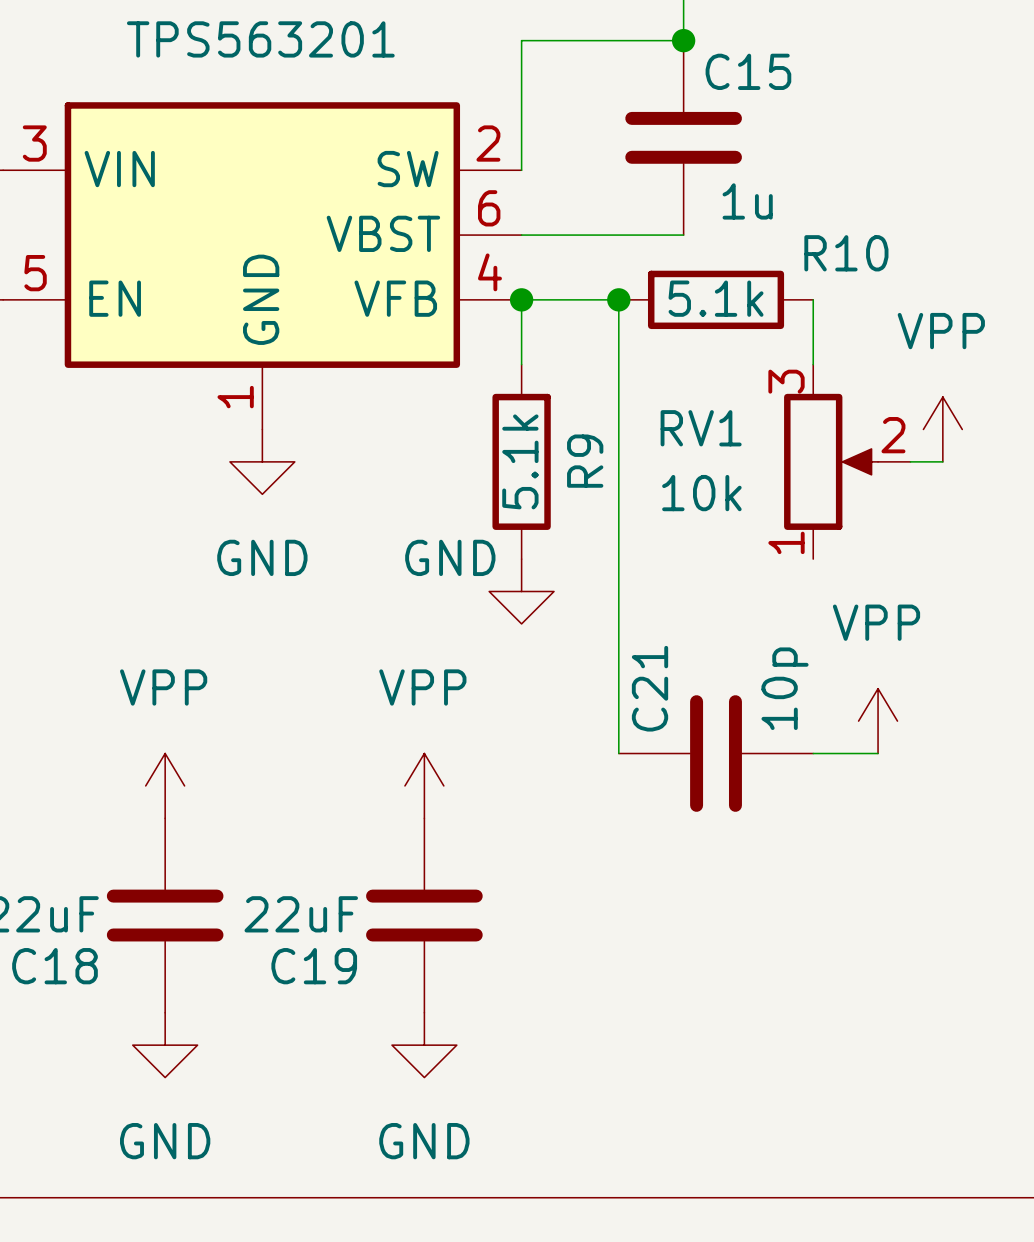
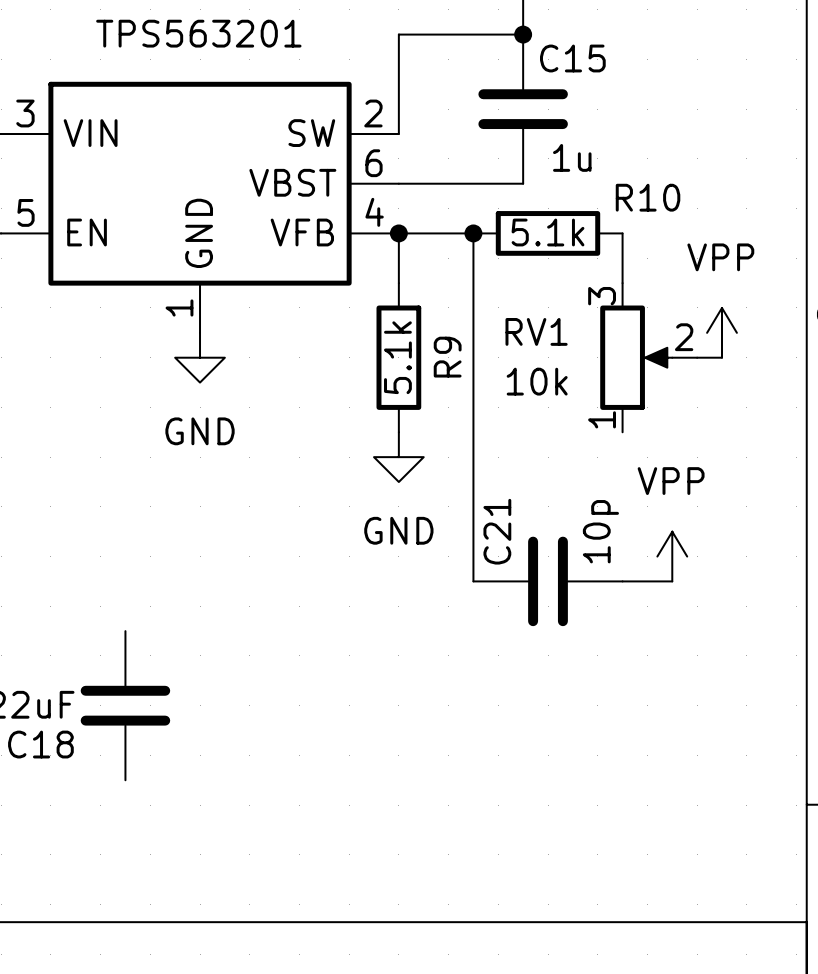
power symbol text position: GND (450, 557) -> GND (398, 530)
power symbol: VPP (165, 785) -> none
power symbol: VPP (424, 785) -> none
C19: 22uF (424, 915) -> none
power symbol: GND (165, 1045) -> none
power symbol: GND (424, 1045) -> none

